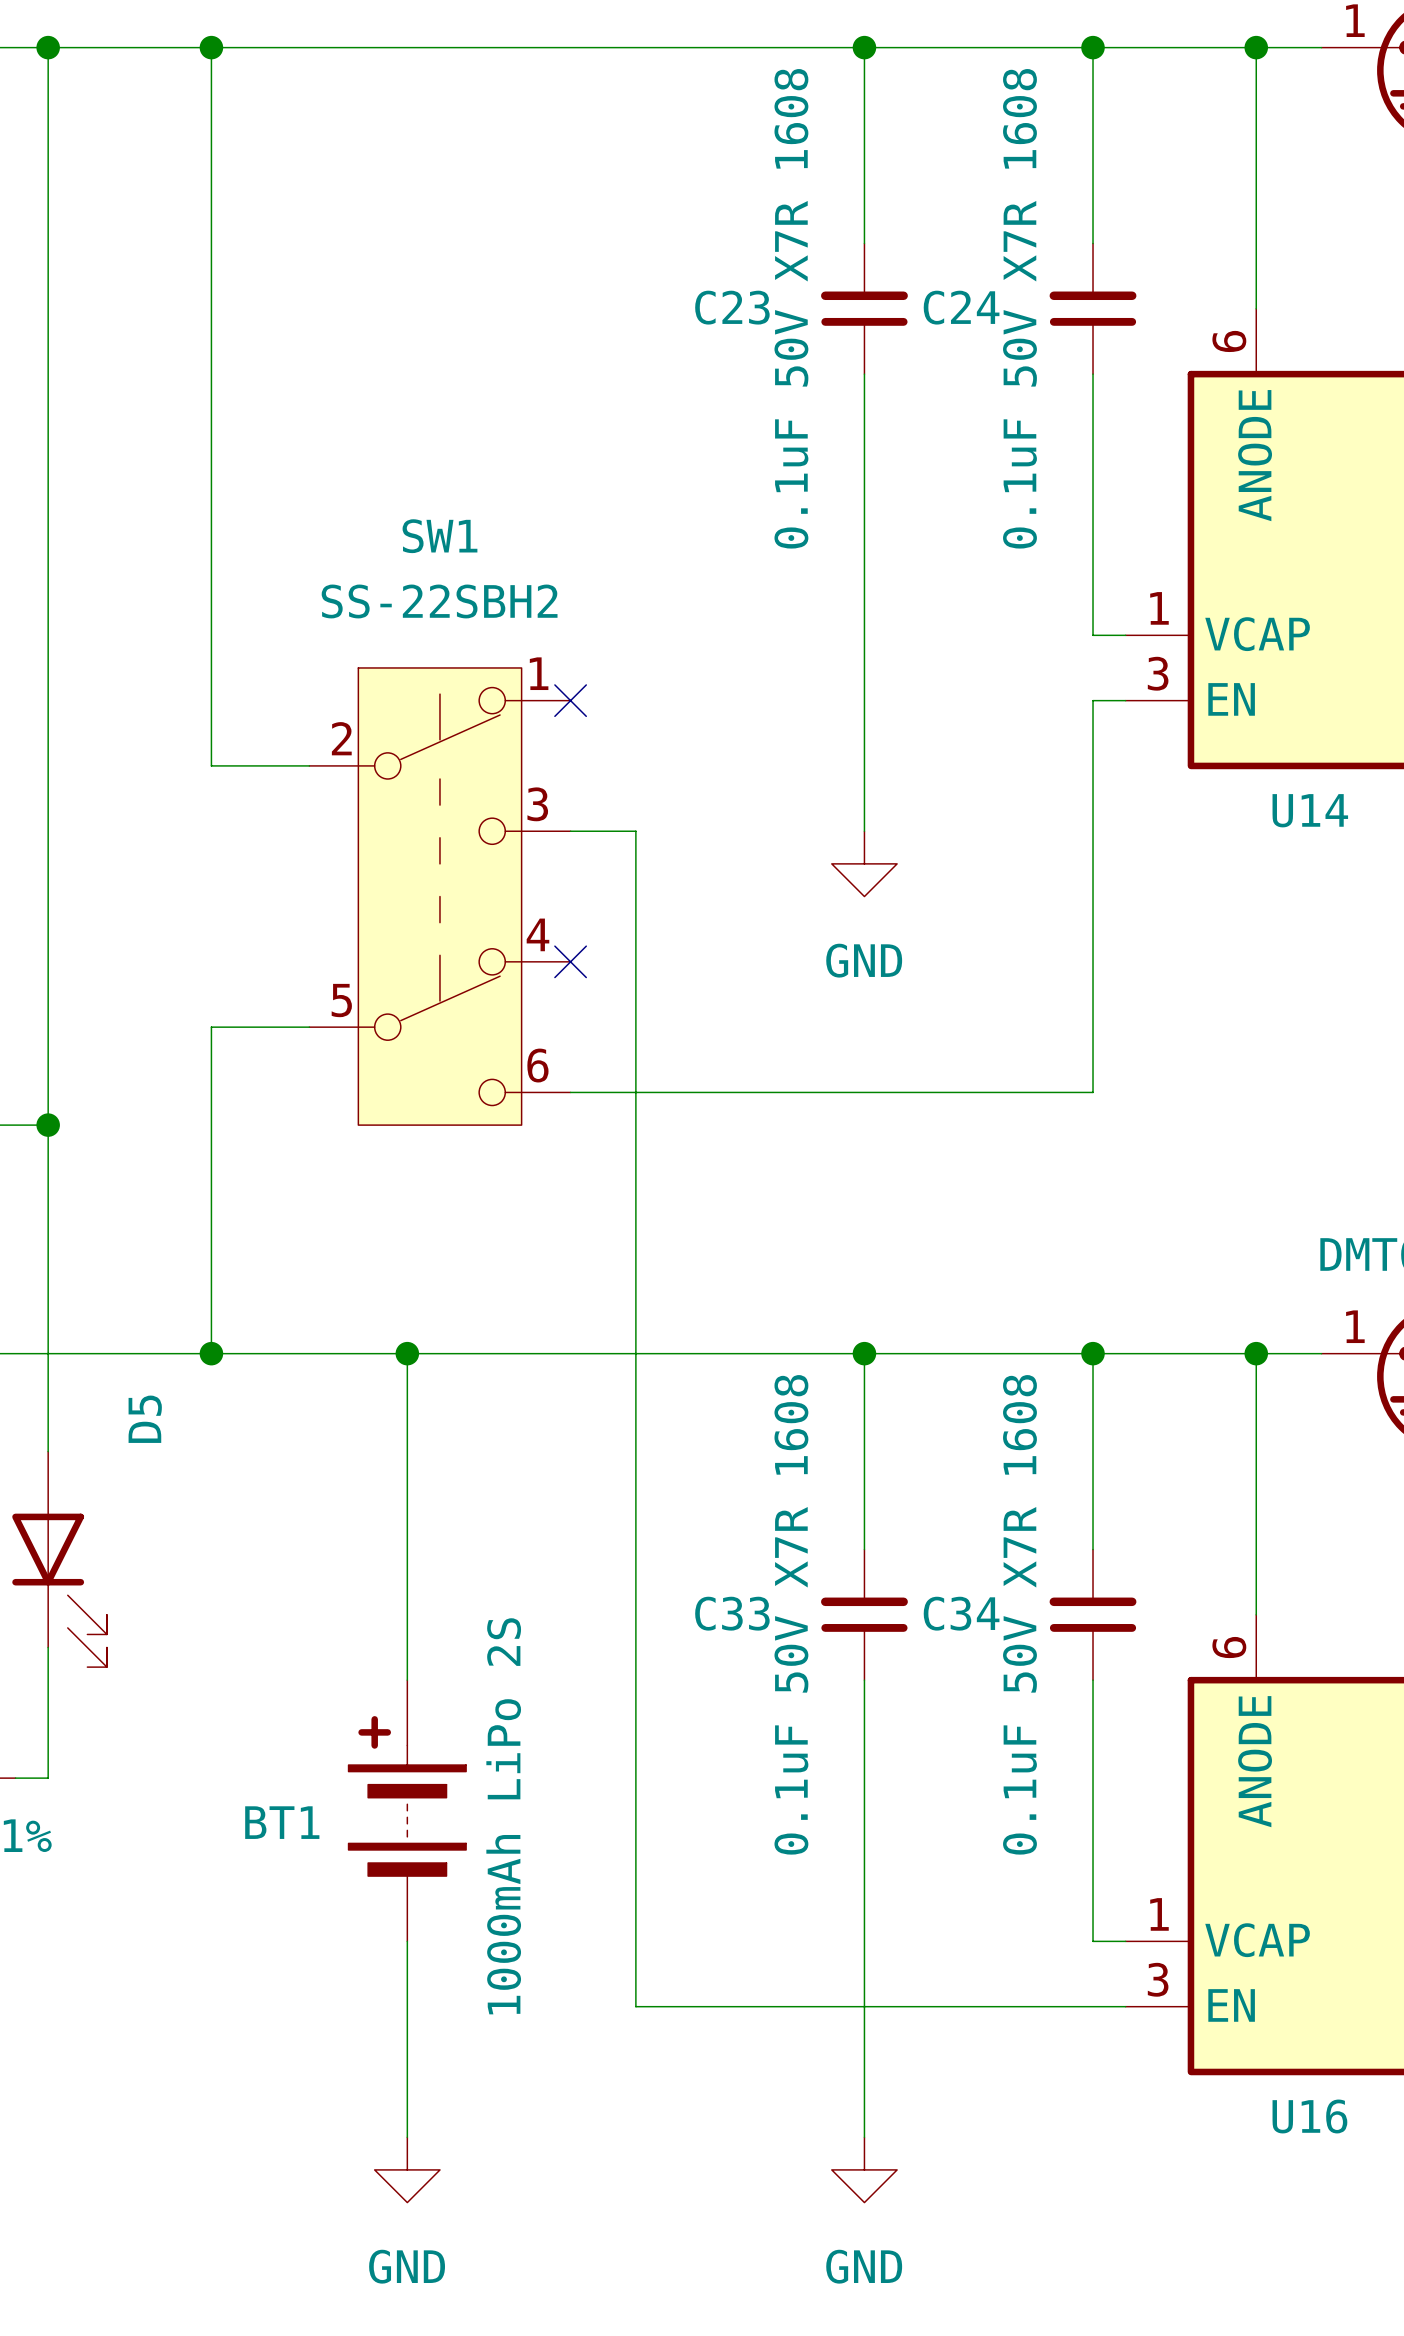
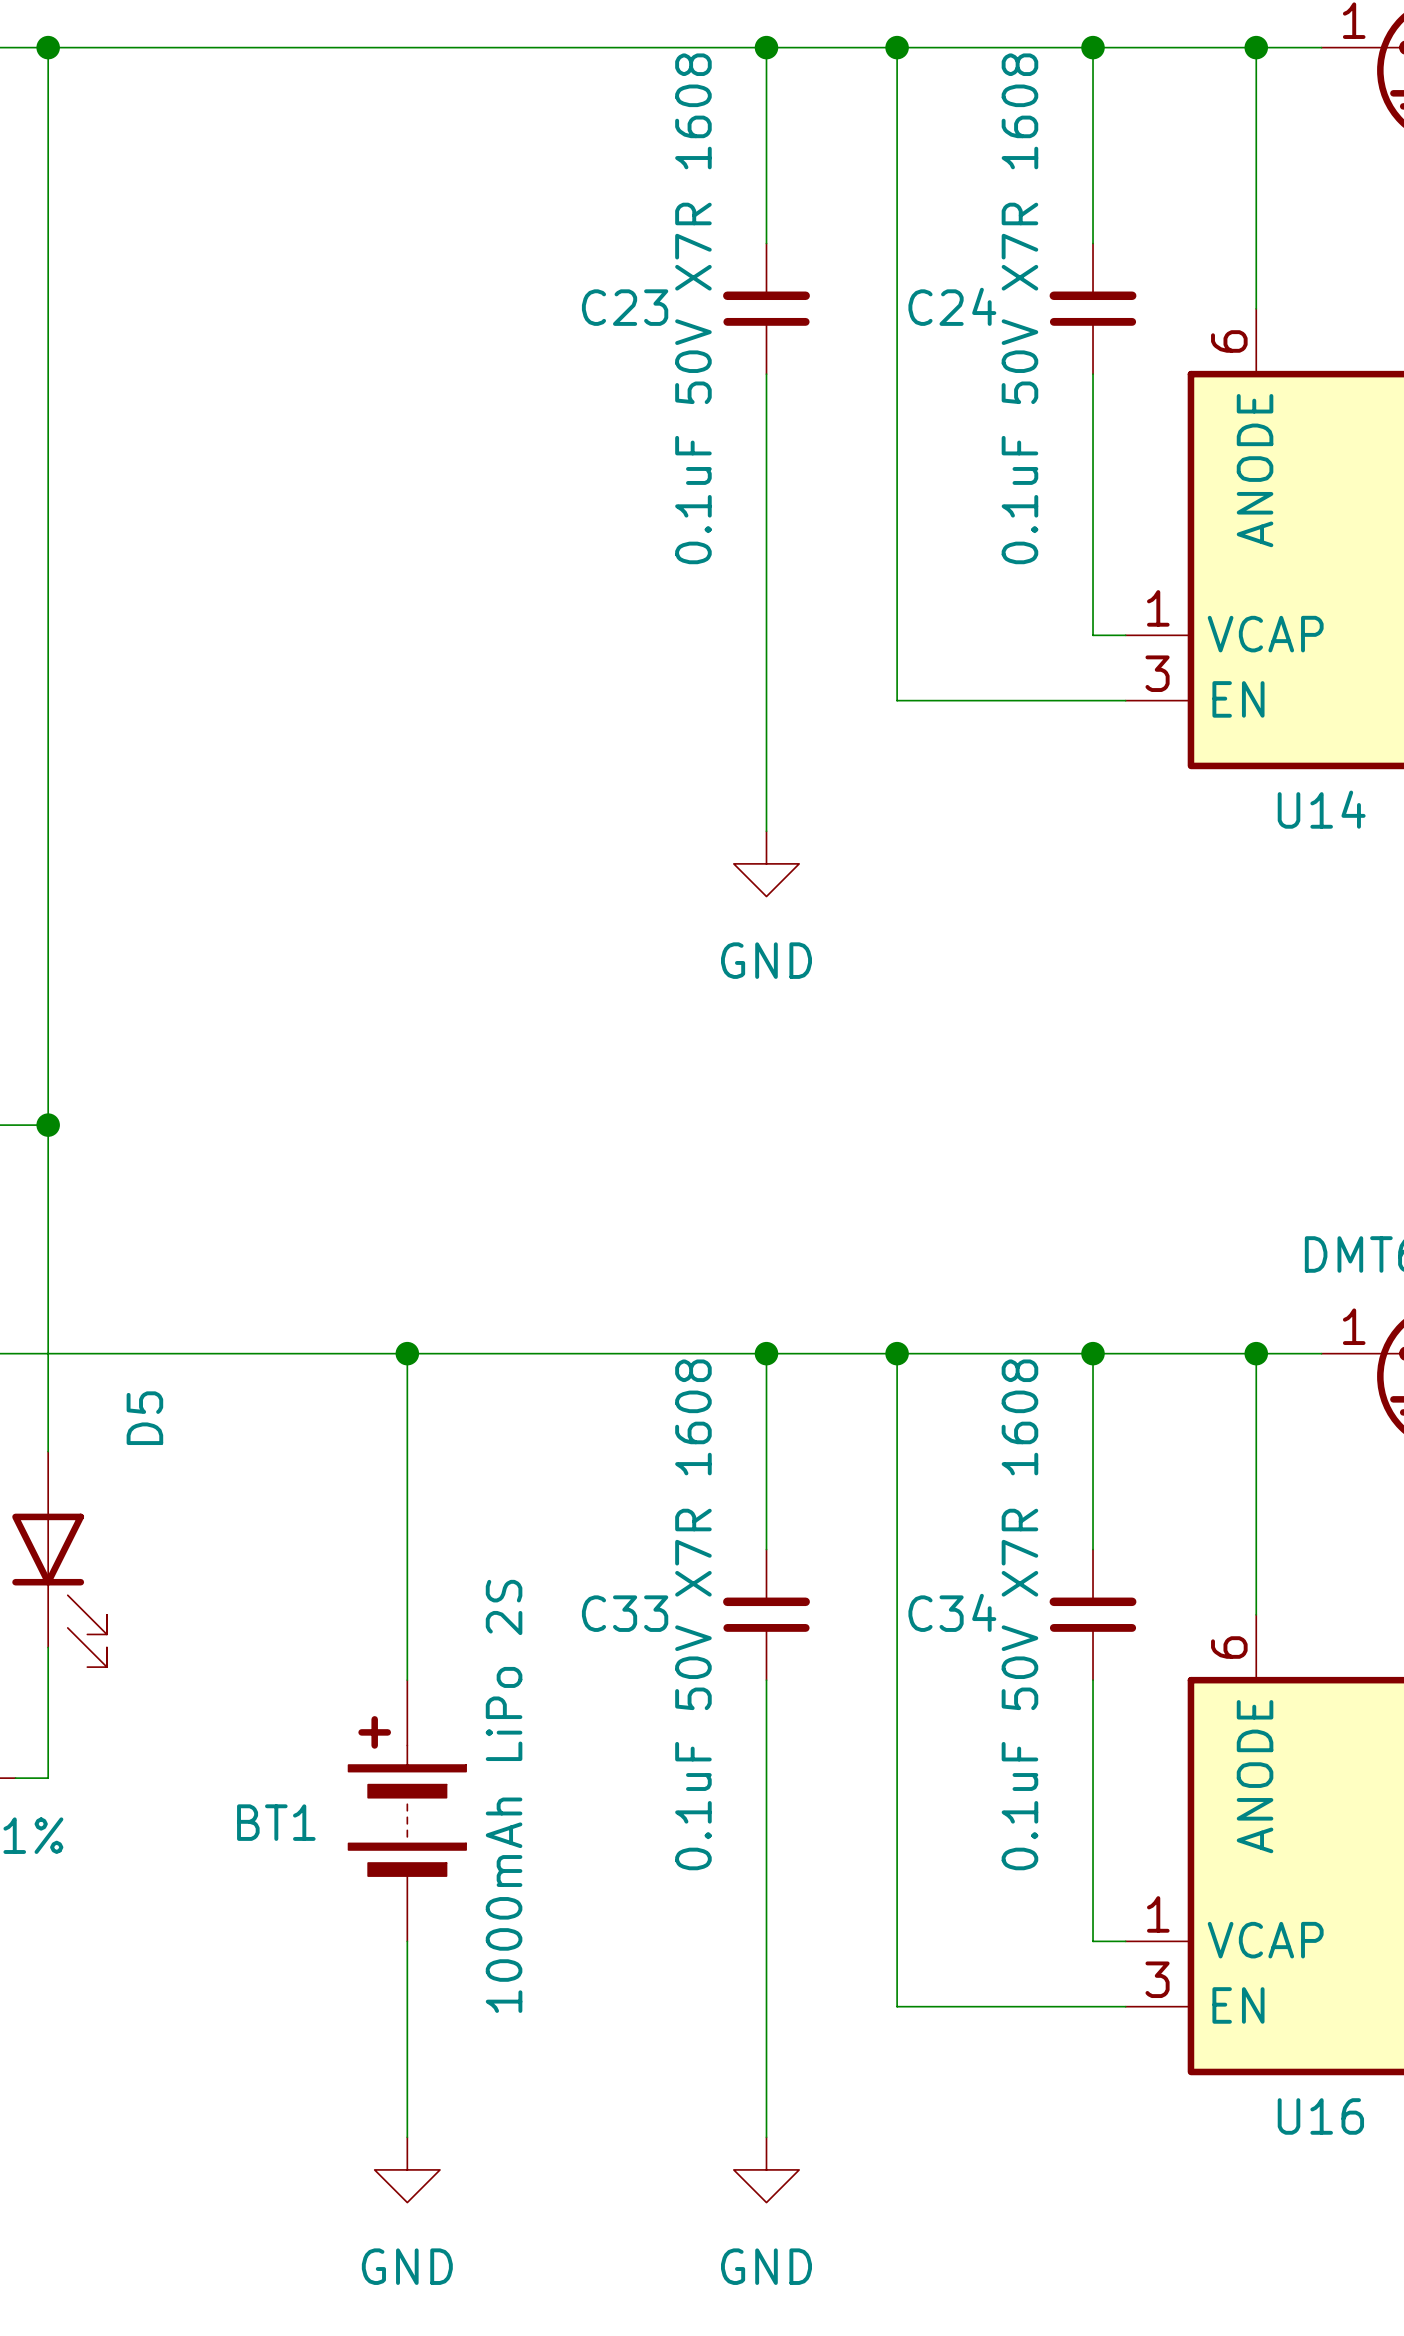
wire: (211, 47) (211, 765) (309, 765) -> none
junction: (211, 47) -> none
junction: none -> (766, 47)
wire: (864, 47) (864, 243) -> (766, 47) (766, 243)
junction position: (864, 47) -> (897, 47)
C23 position: (864, 308) -> (766, 308)
wire: (864, 374) (864, 831) -> (766, 374) (766, 831)
no-connect mark: (570, 700) -> none
wire: (1093, 700) (1093, 1092) (570, 1092) -> (1093, 700) (897, 700) (897, 47)
wire: (570, 831) (635, 831) (635, 2006) (897, 2006) -> (897, 1353) (897, 2006)
power symbol position: GND (864, 863) -> GND (766, 863)
SW1: SS-22SBH2 (439, 896) -> none
no-connect mark: (570, 961) -> none
wire: (309, 1027) (211, 1027) (211, 1353) -> none
junction: (211, 1353) -> none
junction: none -> (766, 1353)
wire: (864, 1353) (864, 1549) -> (766, 1353) (766, 1549)
junction position: (864, 1353) -> (897, 1353)
C33 position: (864, 1614) -> (766, 1614)
wire: (864, 1680) (864, 2137) -> (766, 1680) (766, 2137)
power symbol position: GND (864, 2169) -> GND (766, 2169)

